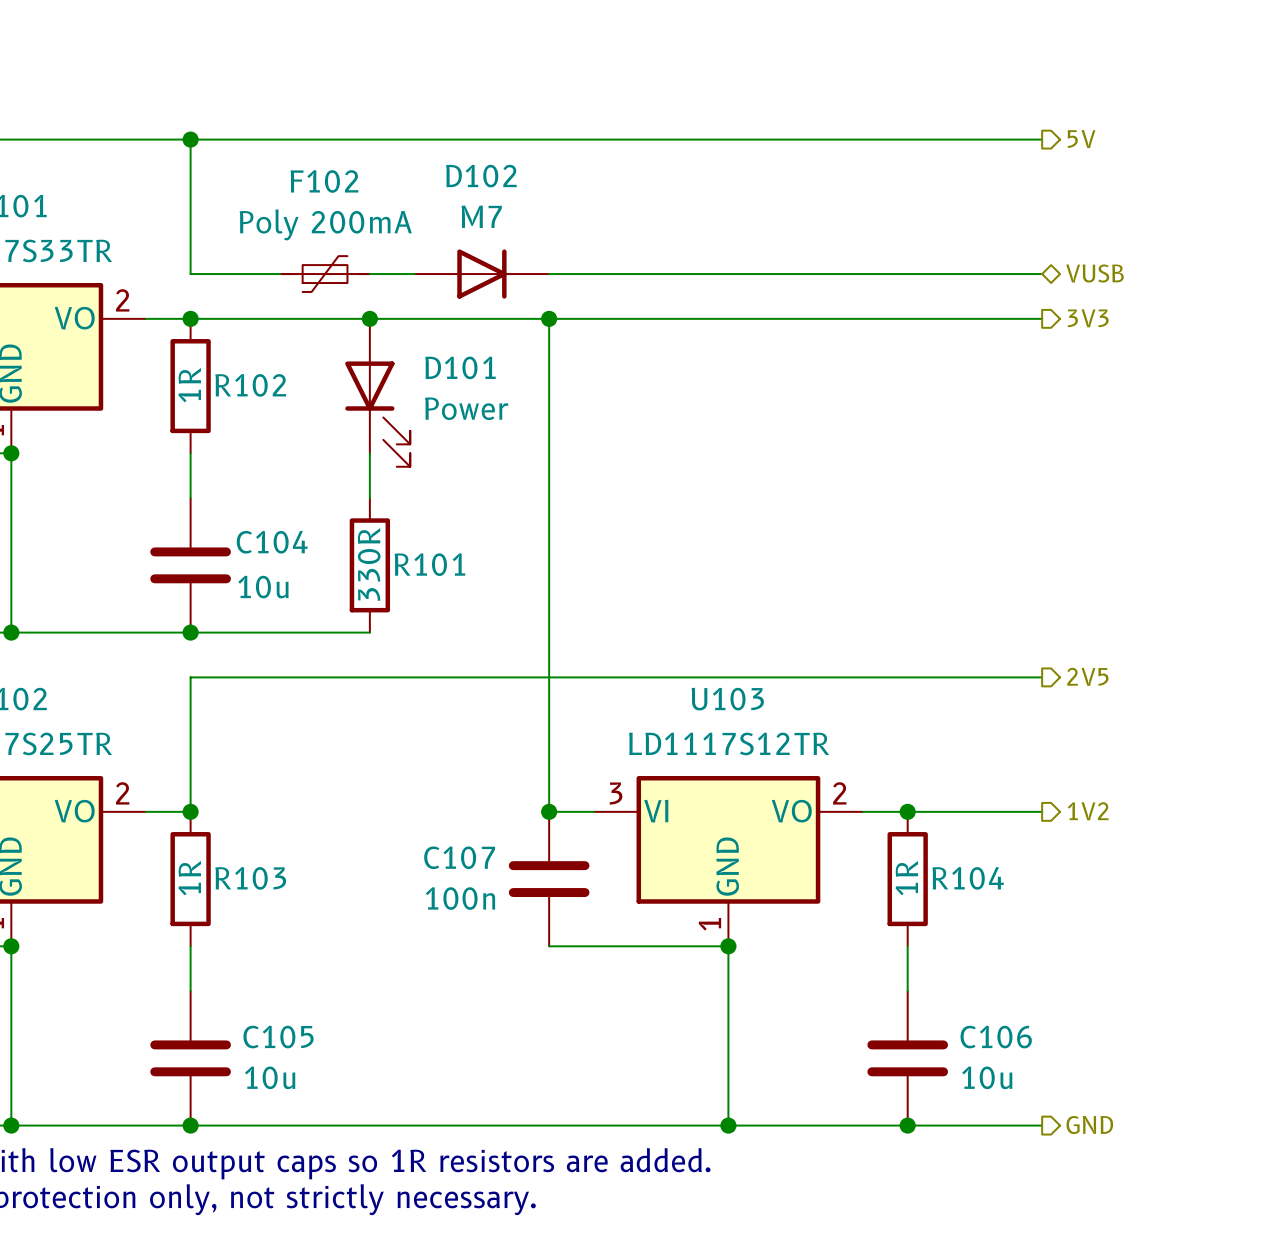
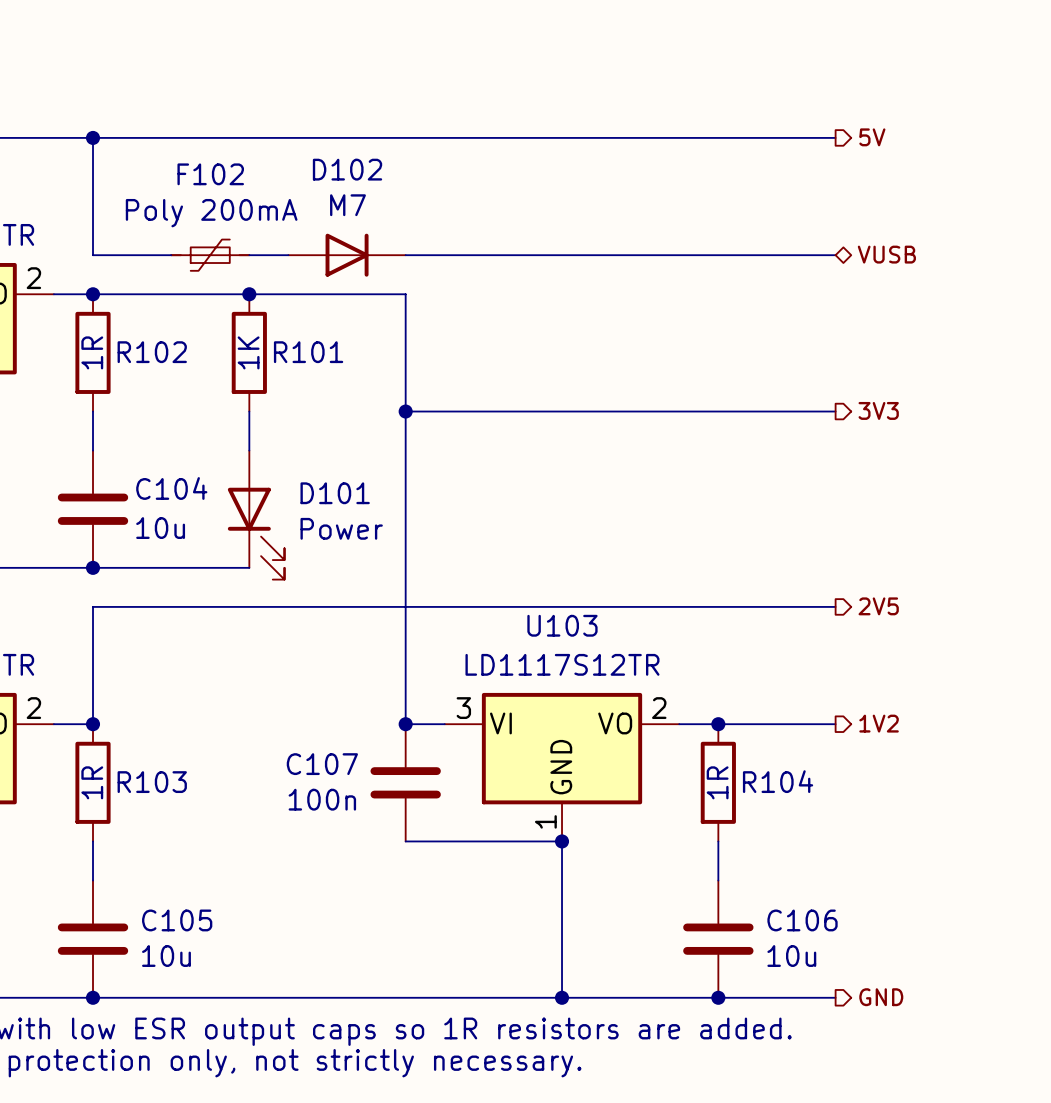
wire: (549, 318) (1042, 318) -> (405, 411) (835, 411)
junction: (549, 318) -> none
hierarchical label position: 3V3 (1088, 318) -> 3V3 (878, 410)
D101 position: (377, 392) -> (256, 515)
junction: none -> (405, 411)
R101 value: 330R (369, 564) -> 1K (248, 352)
R101 position: (369, 565) -> (249, 352)

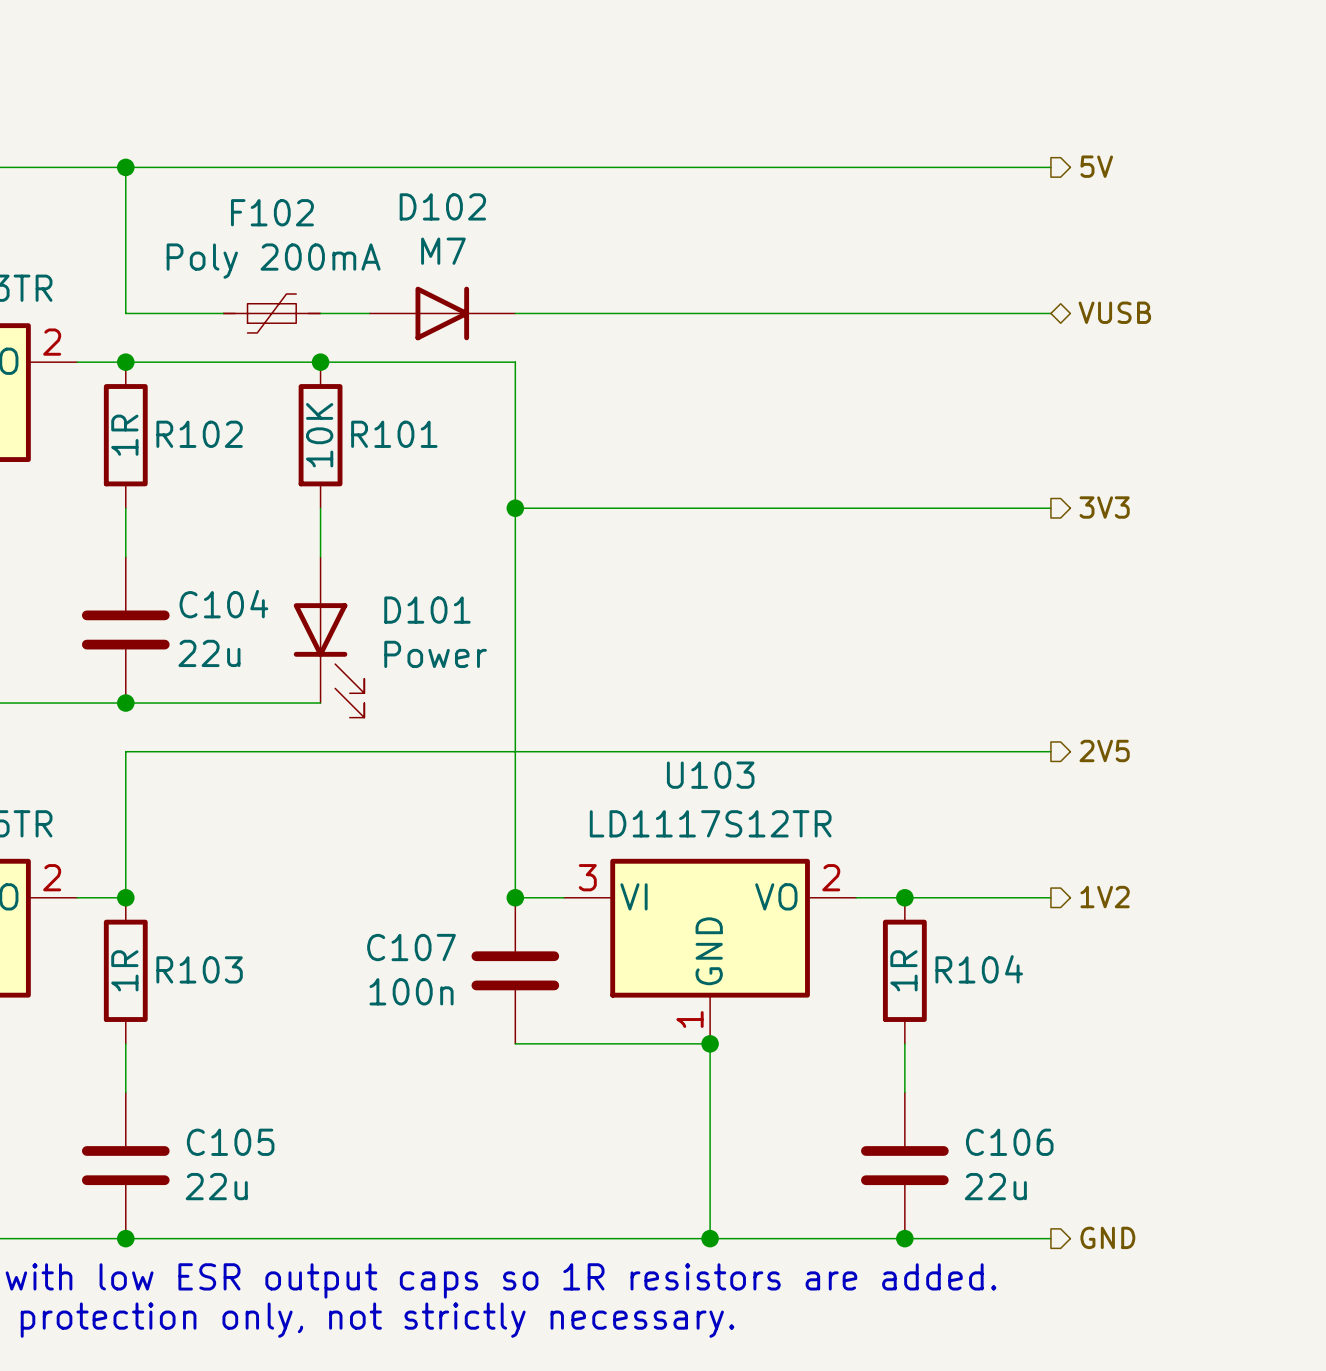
R101 value: 1K (248, 352) -> 10K (319, 435)
C104 value: 10u (160, 528) -> 22u (209, 653)
C105 value: 10u (166, 956) -> 22u (216, 1186)
C106 value: 10u (791, 956) -> 22u (995, 1186)

